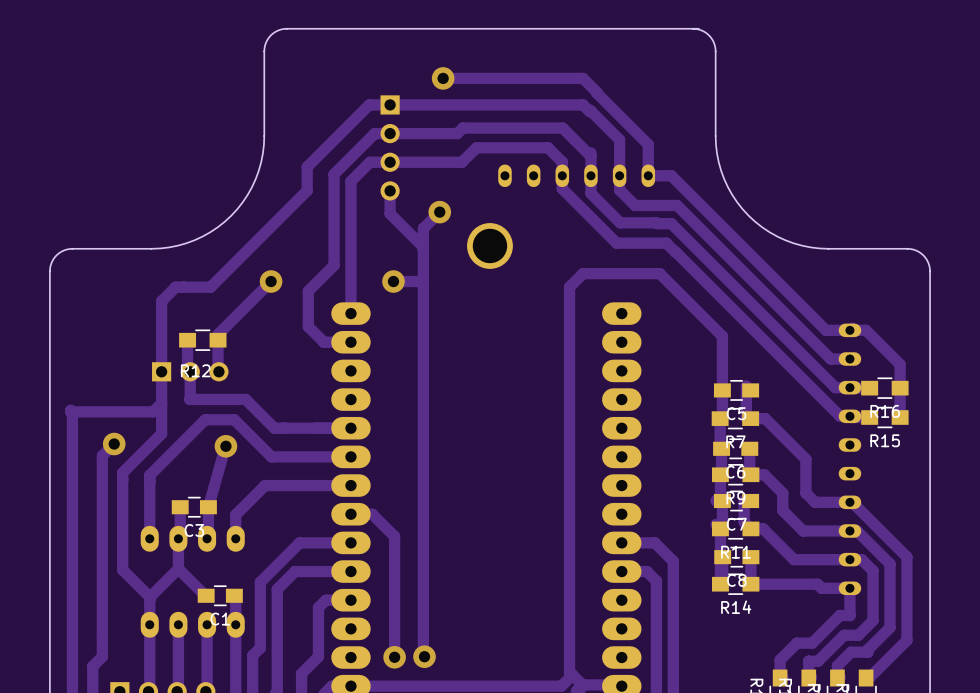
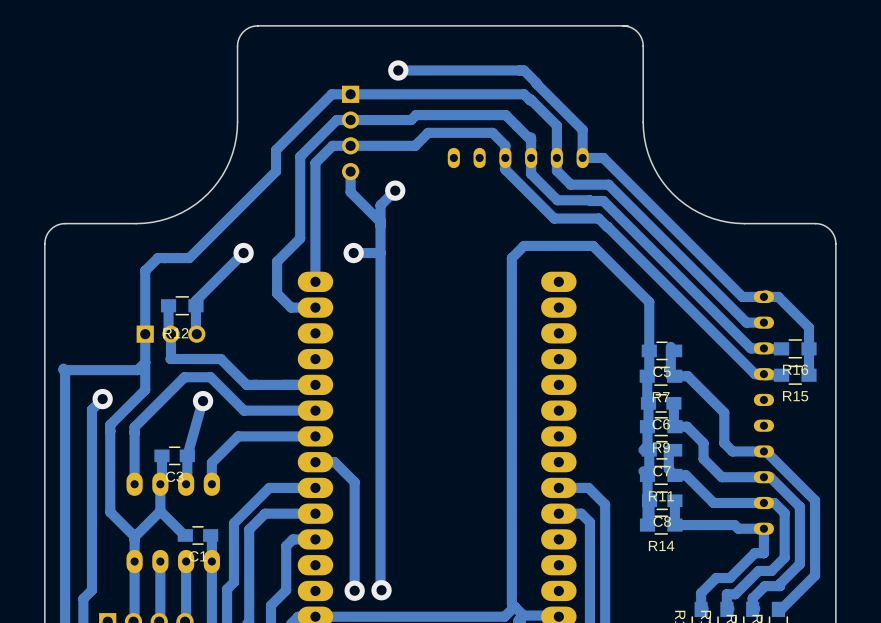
part: (489, 245) -> none

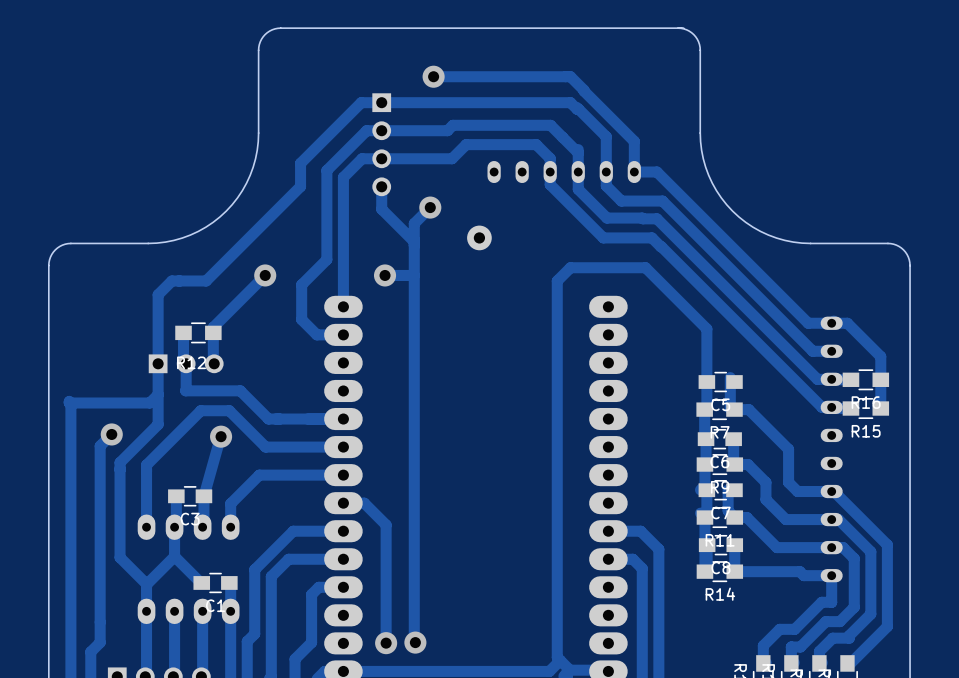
part: none -> (479, 237)

